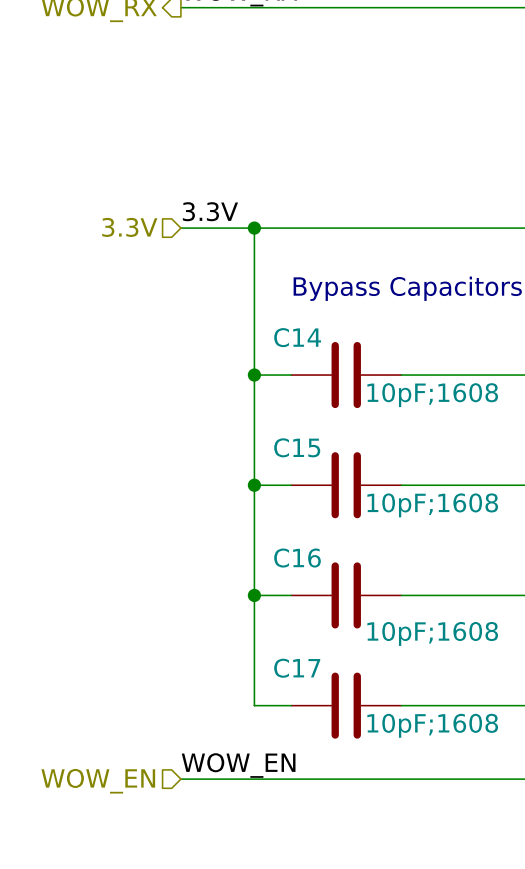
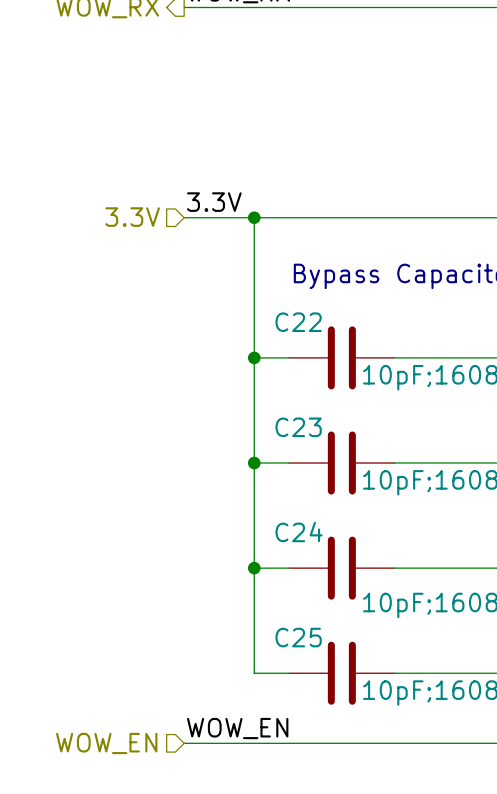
C14 name: C14 (297, 337) -> C22 (298, 322)
C15 name: C15 (297, 447) -> C23 (298, 427)
C16 name: C16 (297, 558) -> C24 (299, 532)
C17 name: C17 (297, 668) -> C25 (298, 637)

